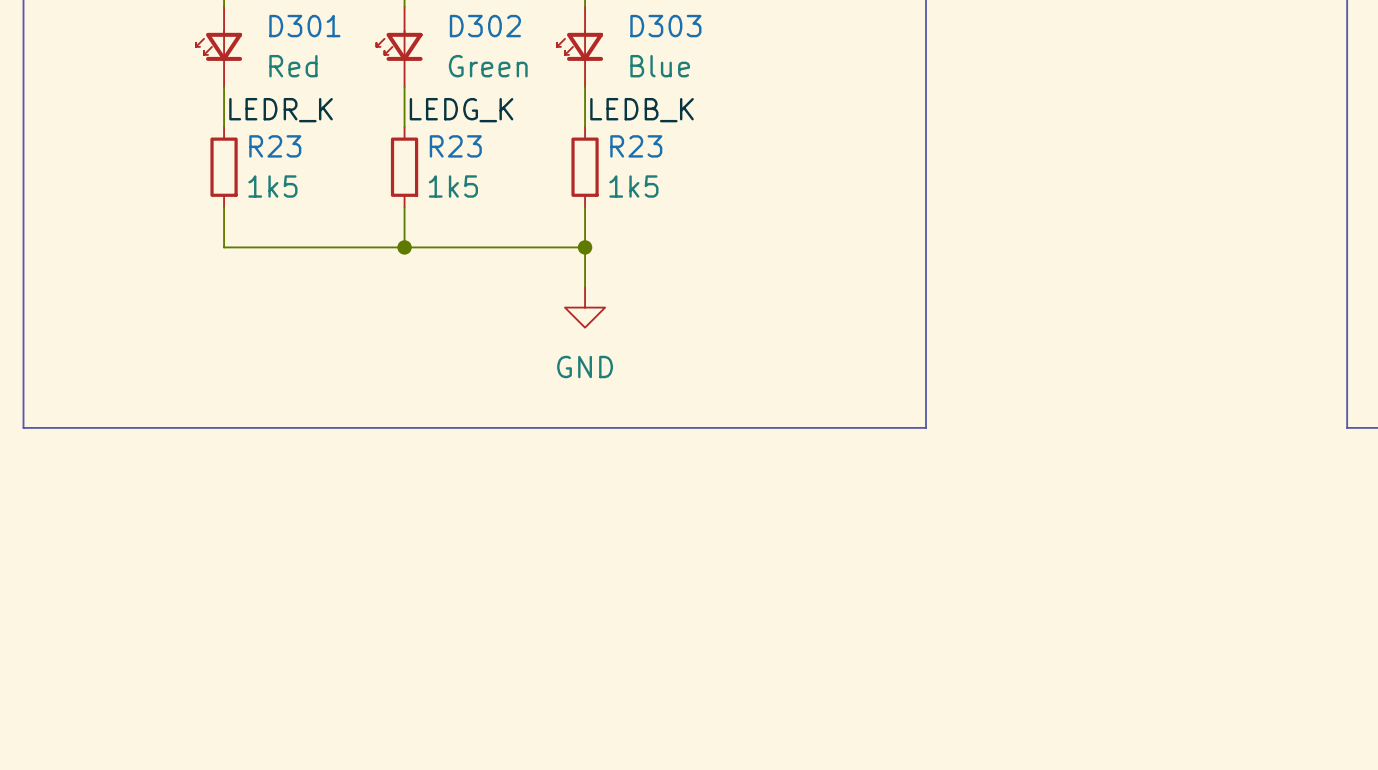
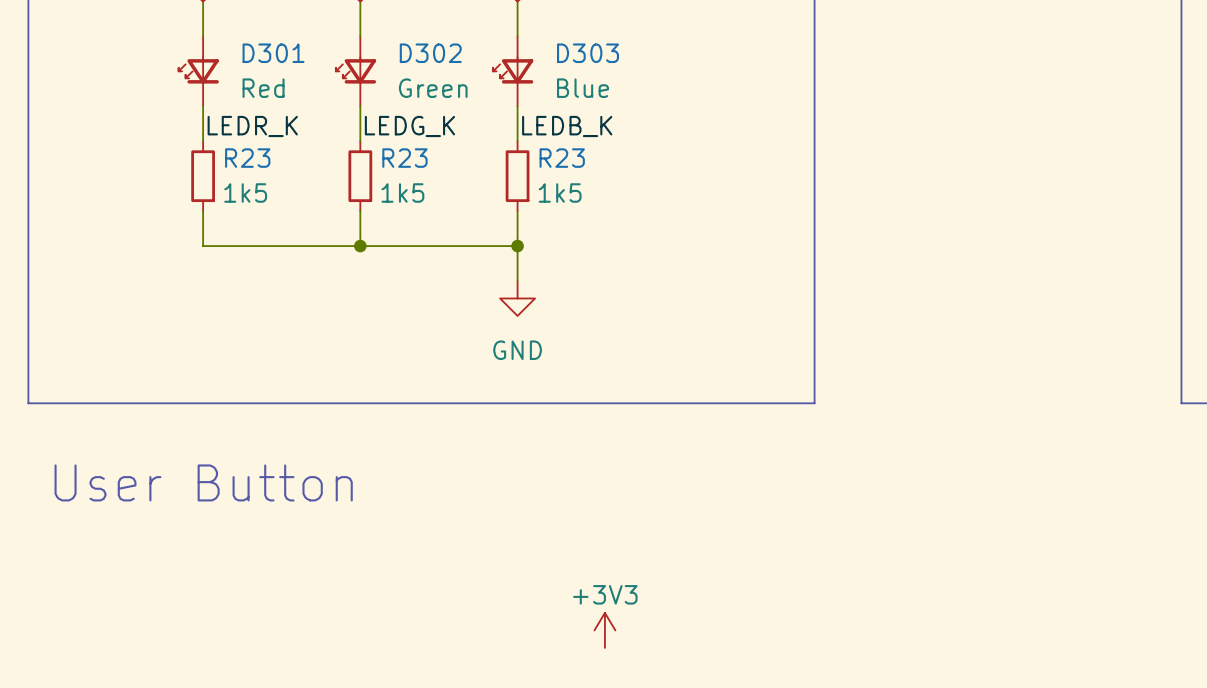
text: none -> User Button (203, 482)
power symbol: none -> +3V3 (604, 630)

